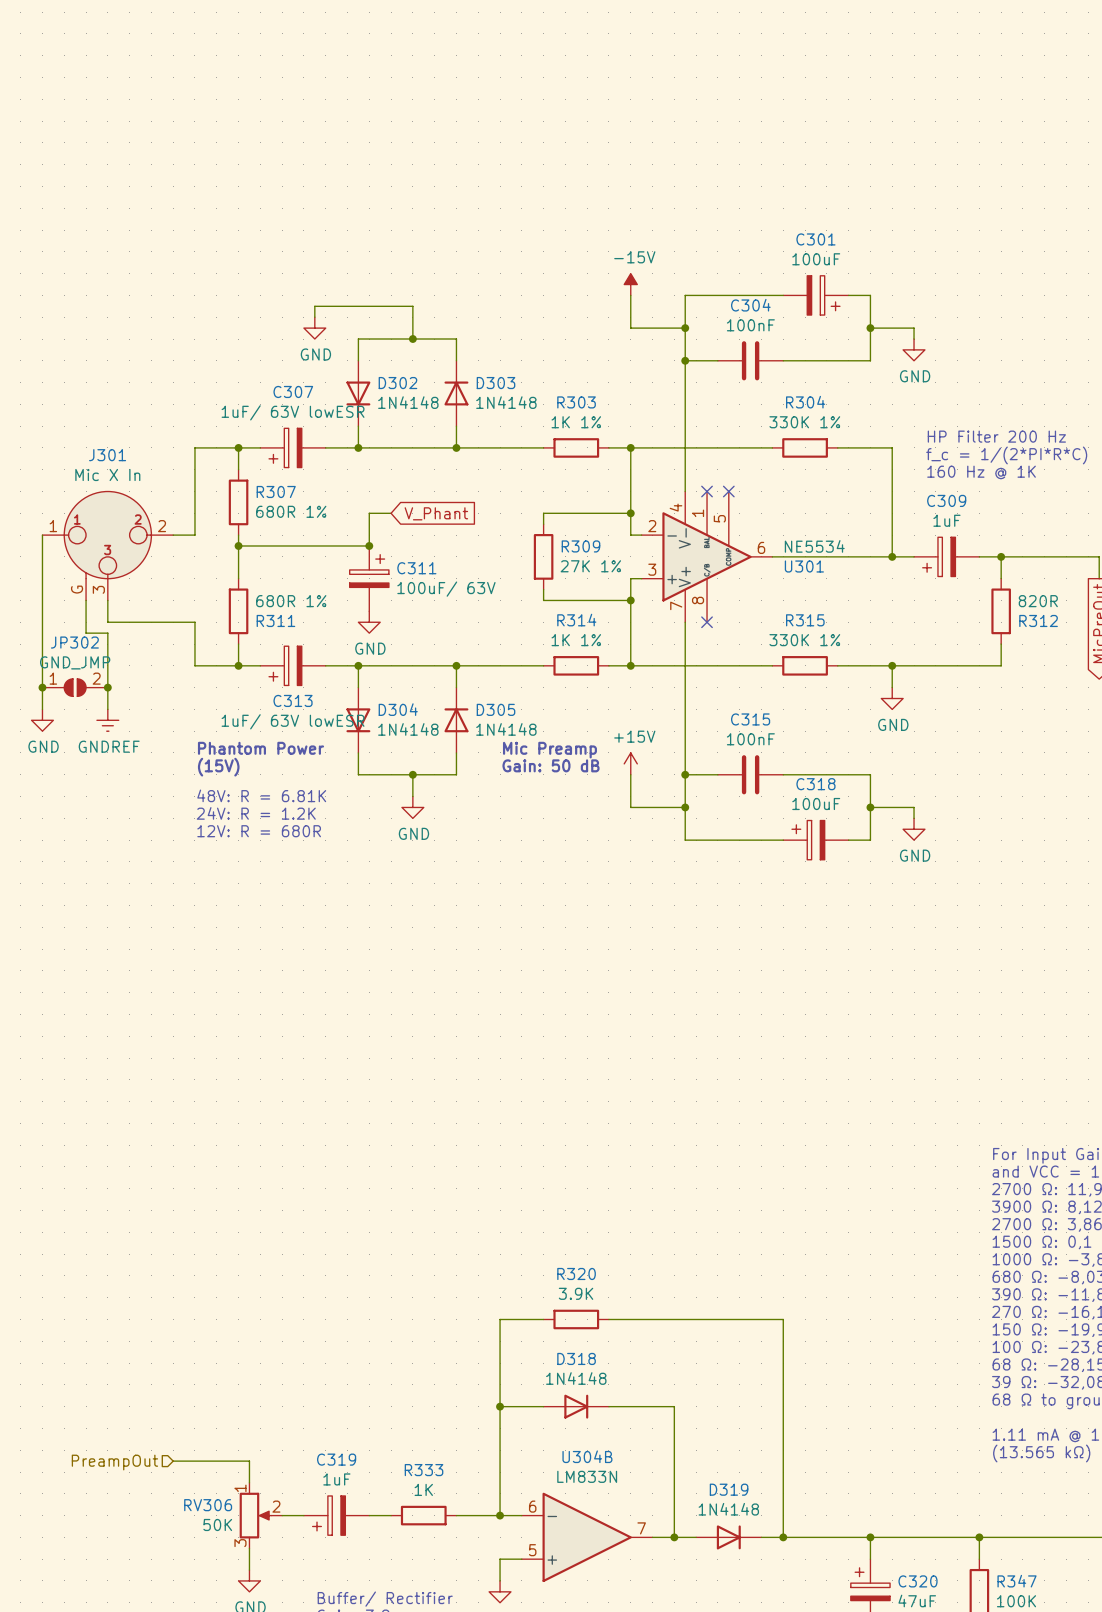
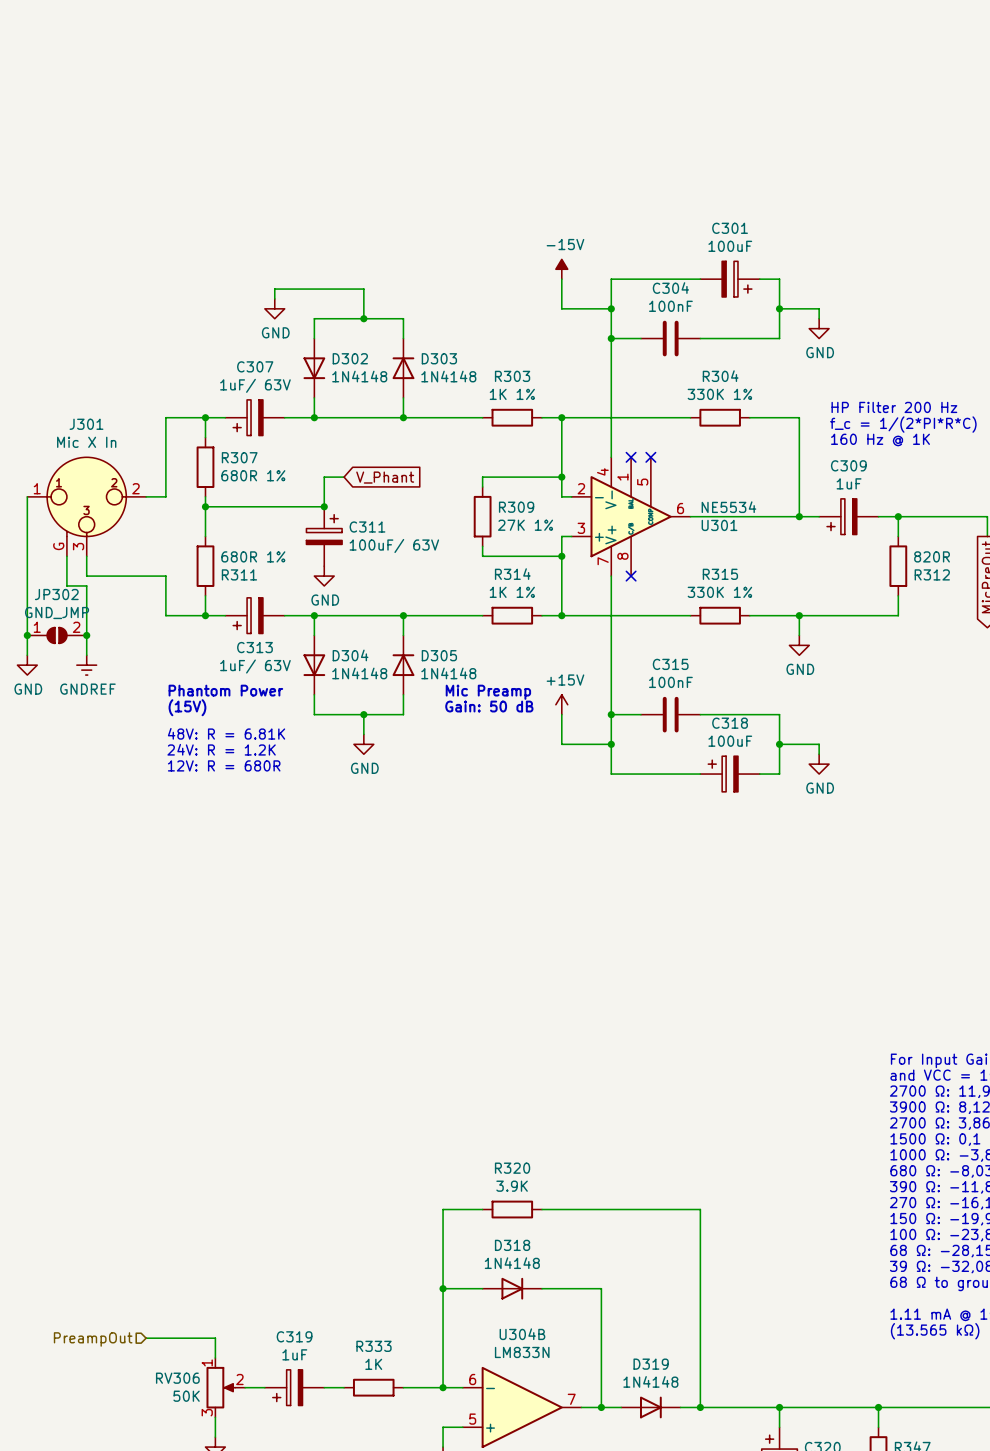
C307 value: 1uF/ 63V lowESR (293, 412) -> 1uF/ 63V (255, 385)
C313 value: 1uF/ 63V lowESR (293, 721) -> 1uF/ 63V (255, 666)

